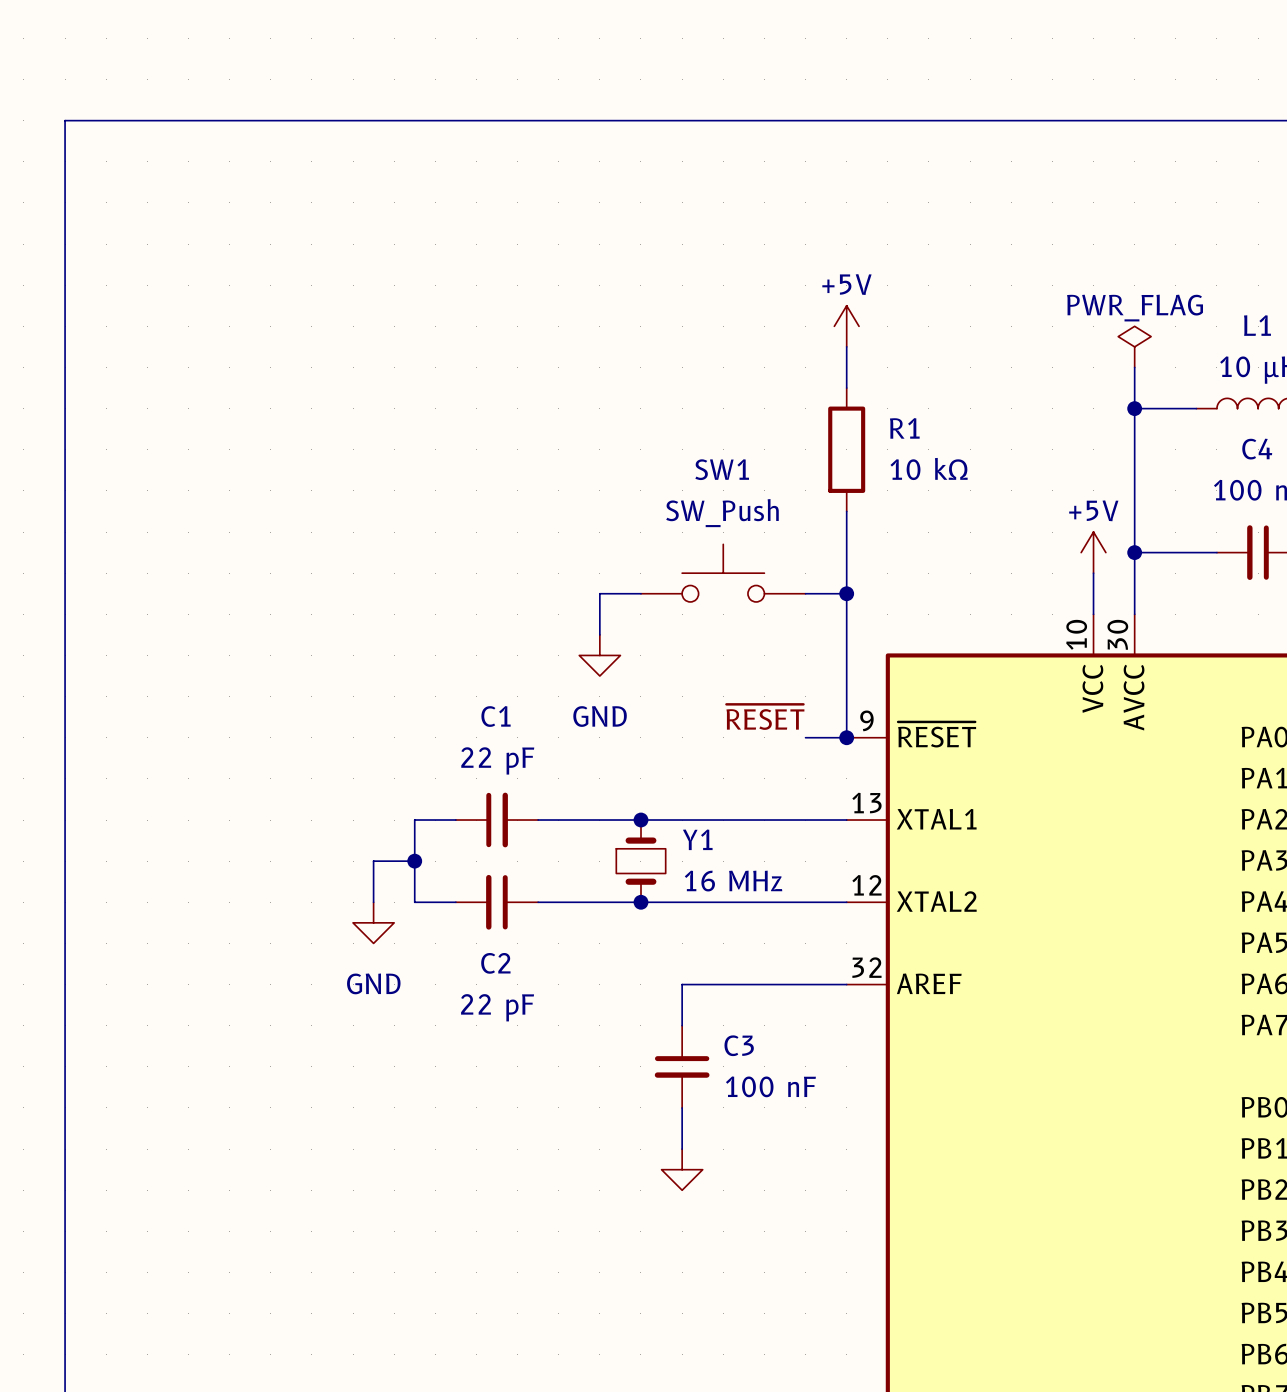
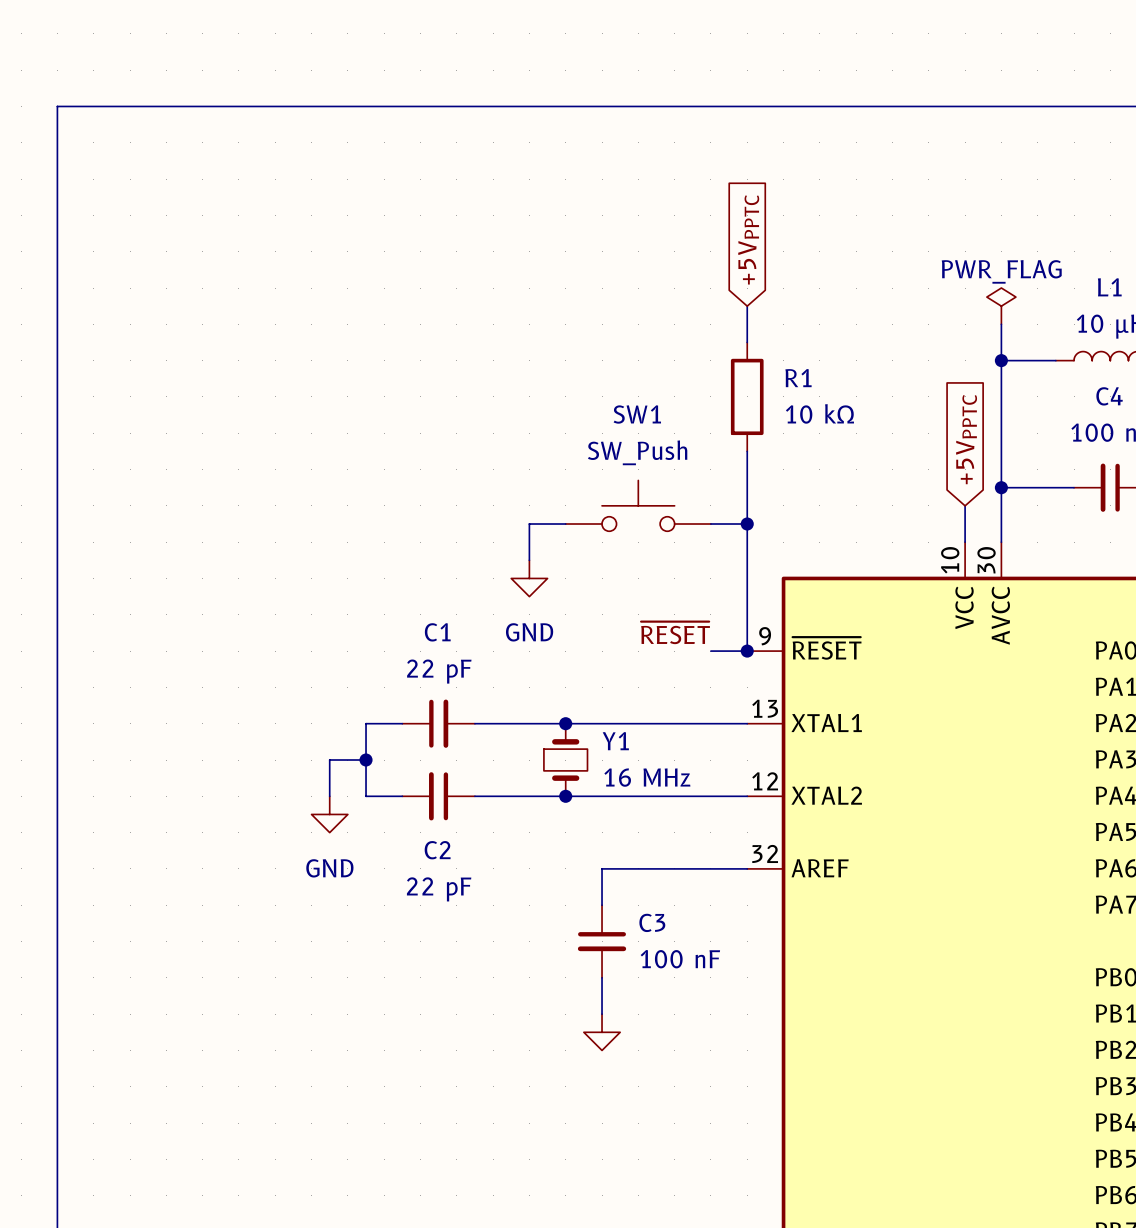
global label: none -> +5VPPTC (748, 239)
power symbol: +5V (846, 326) -> none
global label: none -> +5VPPTC (966, 439)
power symbol: +5V (1093, 552) -> none

